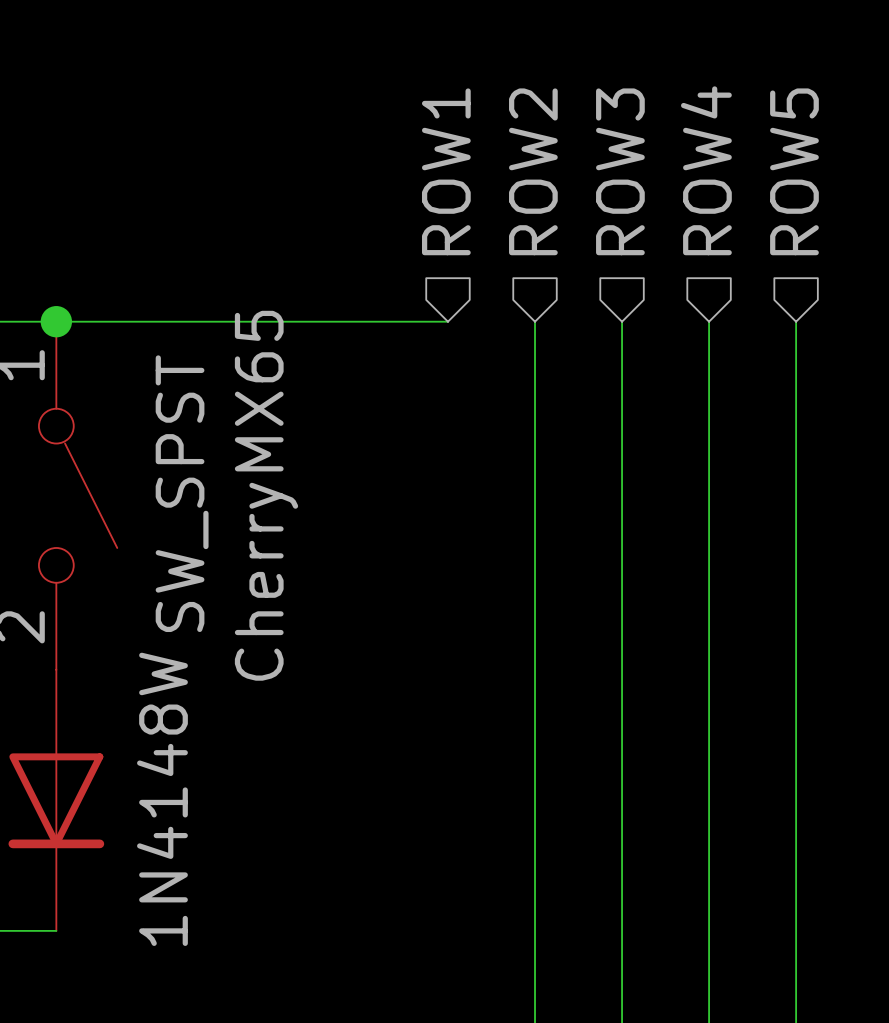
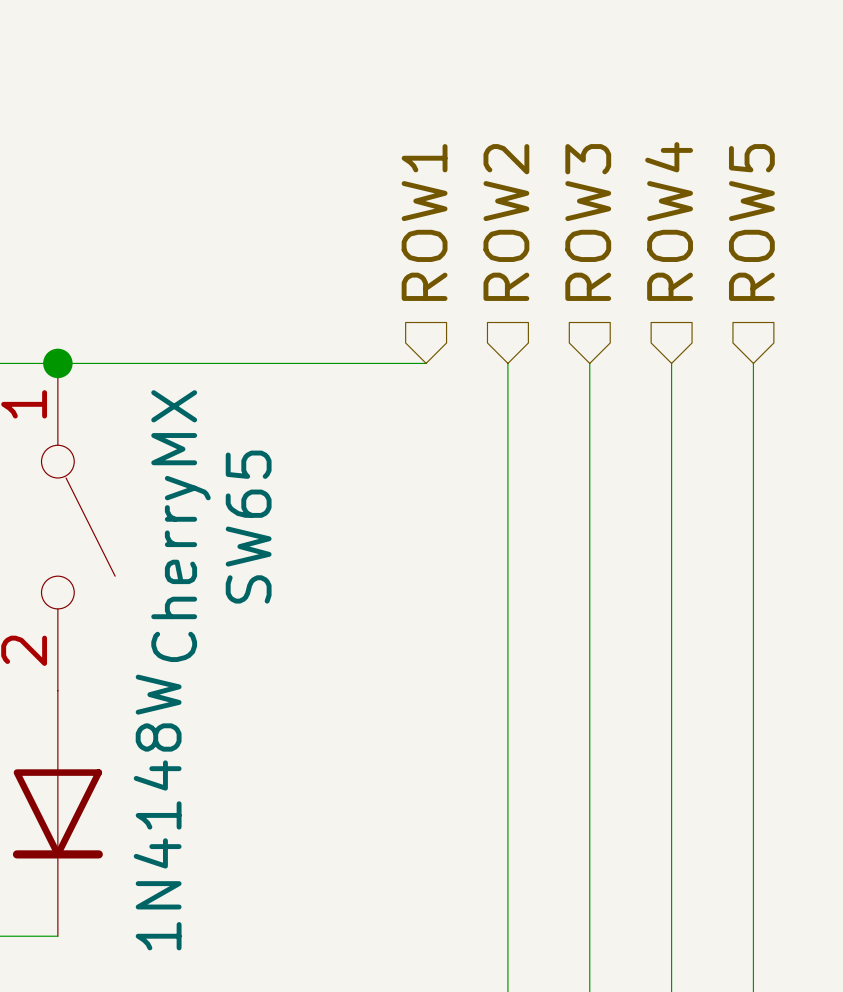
CherryMX65 value: SW_SPST (182, 493) -> CherryMX (181, 526)
CherryMX65 name: CherryMX65 (266, 495) -> SW65 (248, 527)

